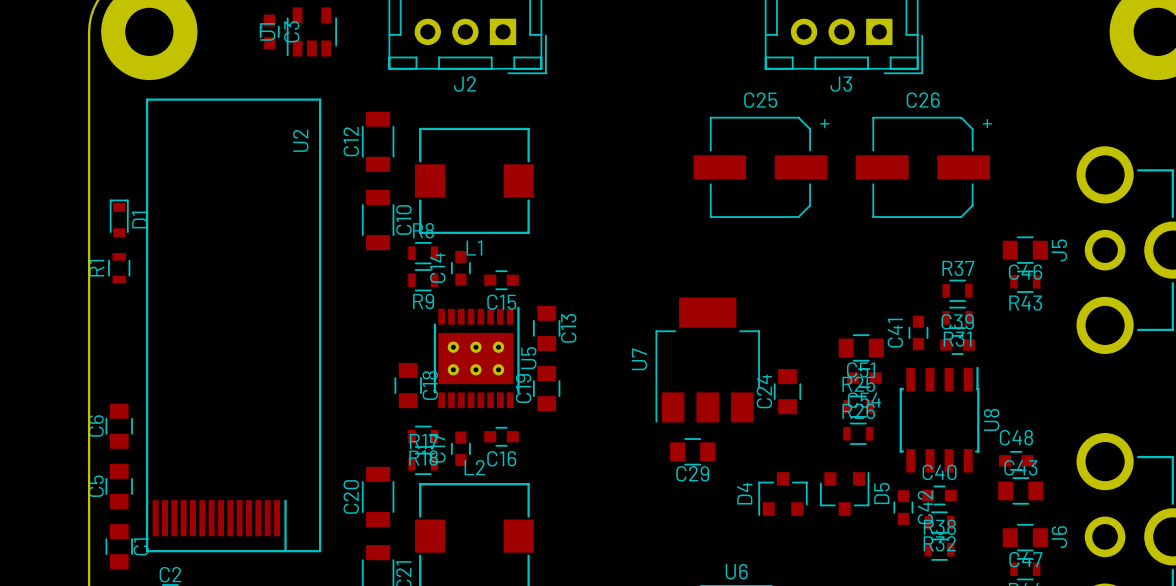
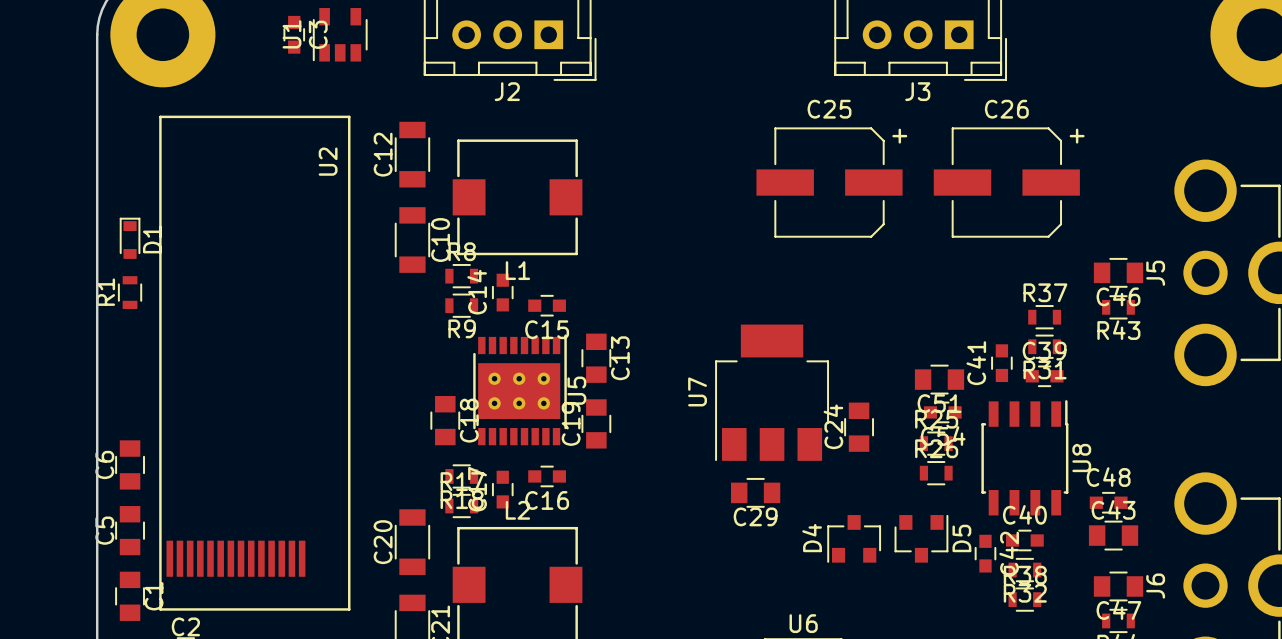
U2 footprint: [145, 98, 322, 553] -> [159, 115, 351, 611]

